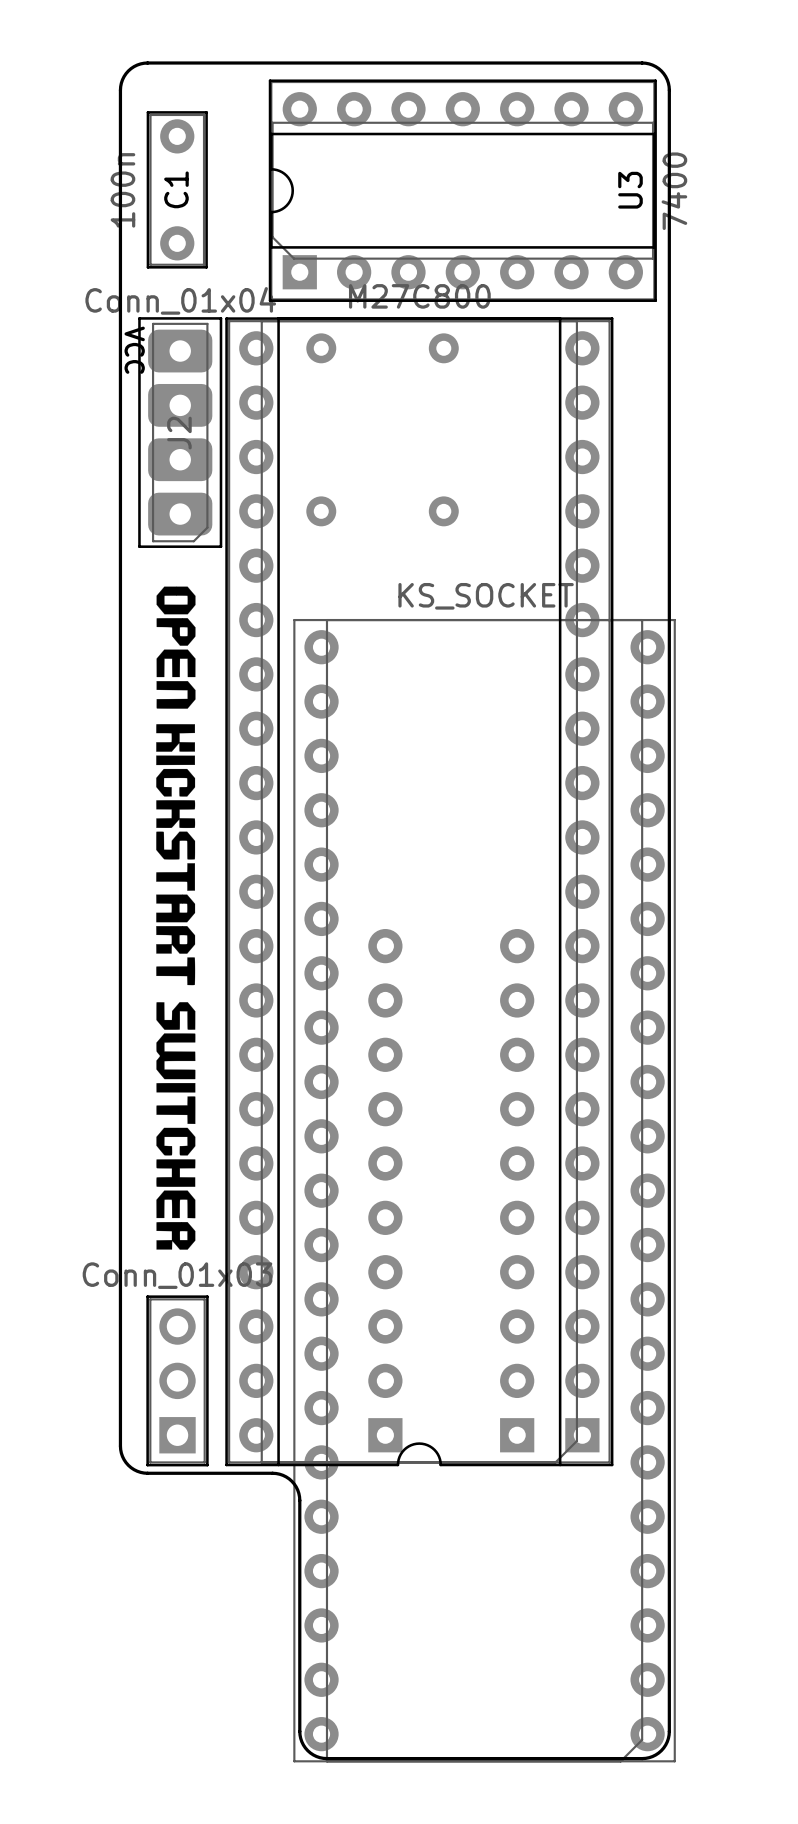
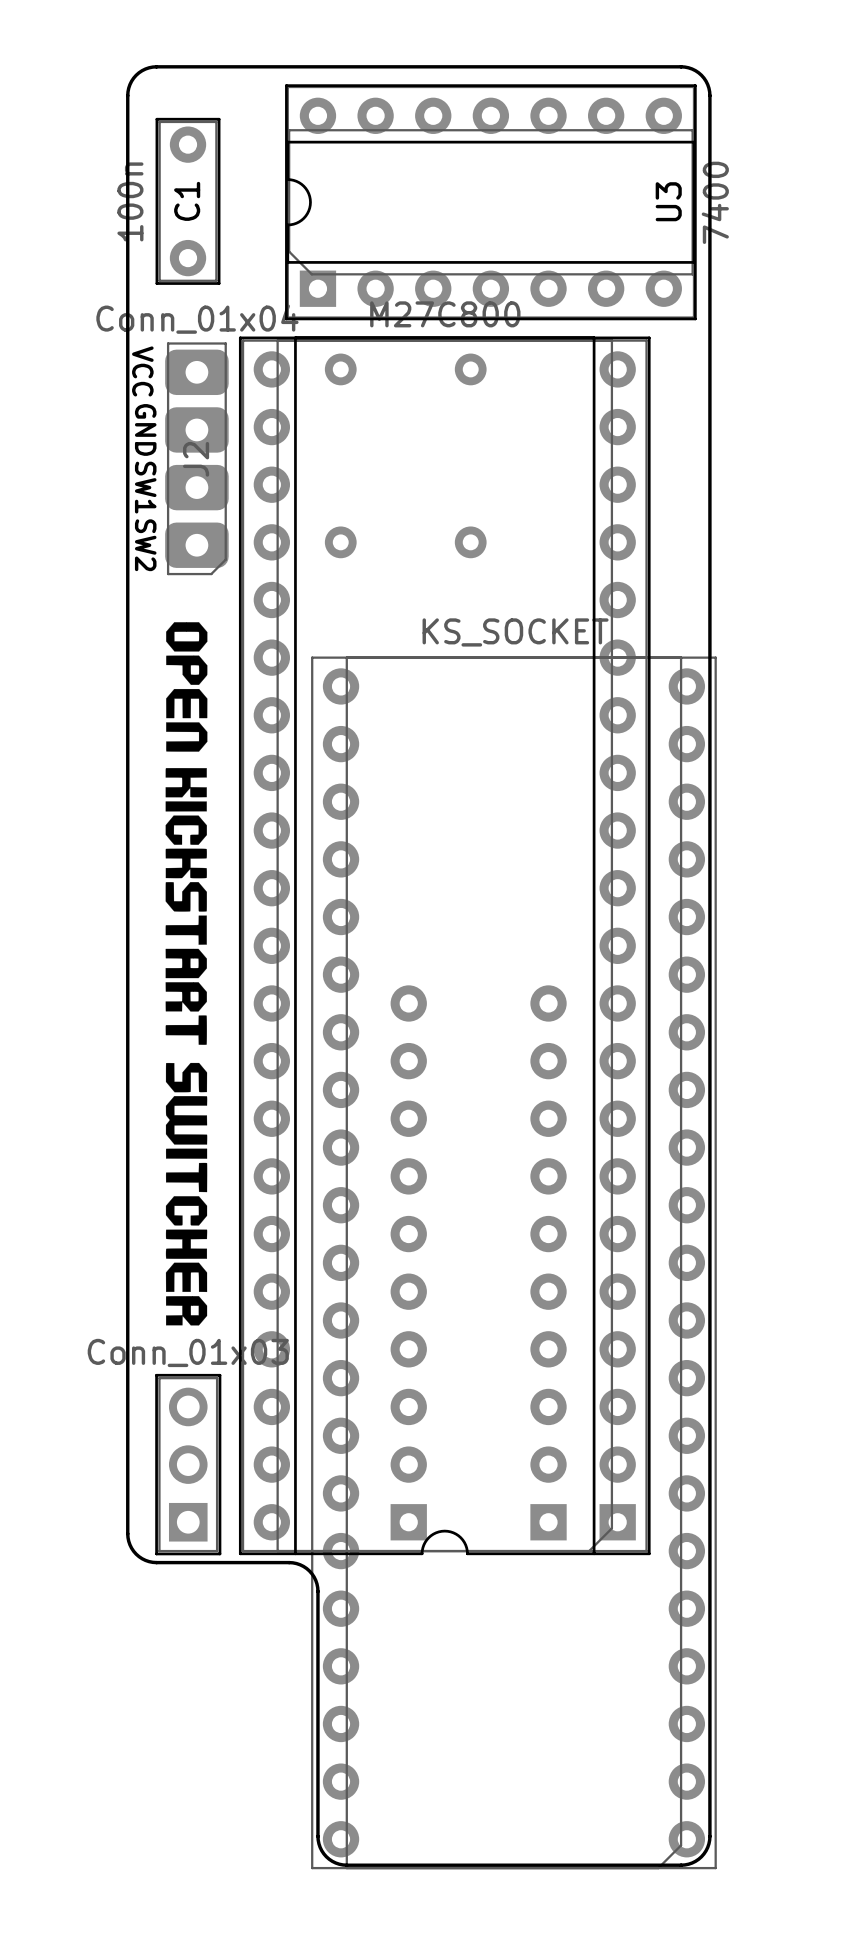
part footprint: [138, 317, 223, 548] -> [165, 342, 229, 576]
text: none -> GND (145, 429)
text: none -> SW1 (145, 487)
text: none -> SW2 (145, 545)

